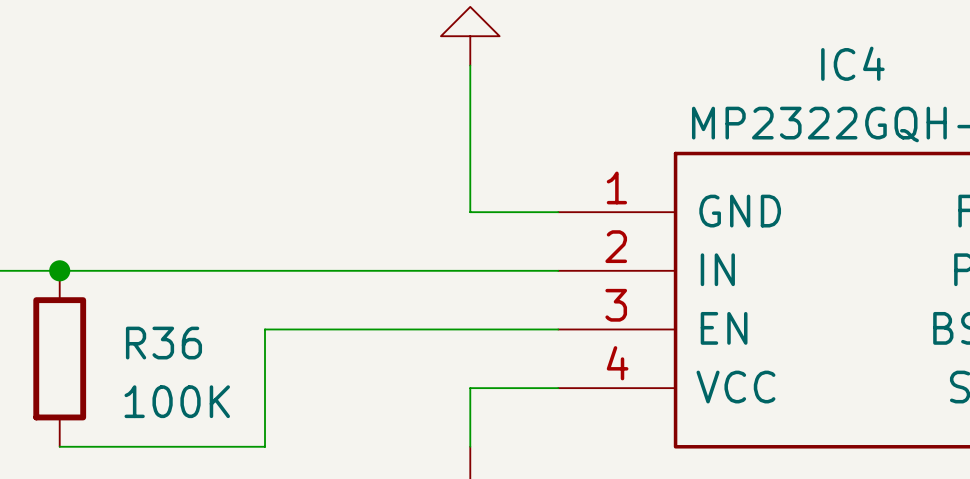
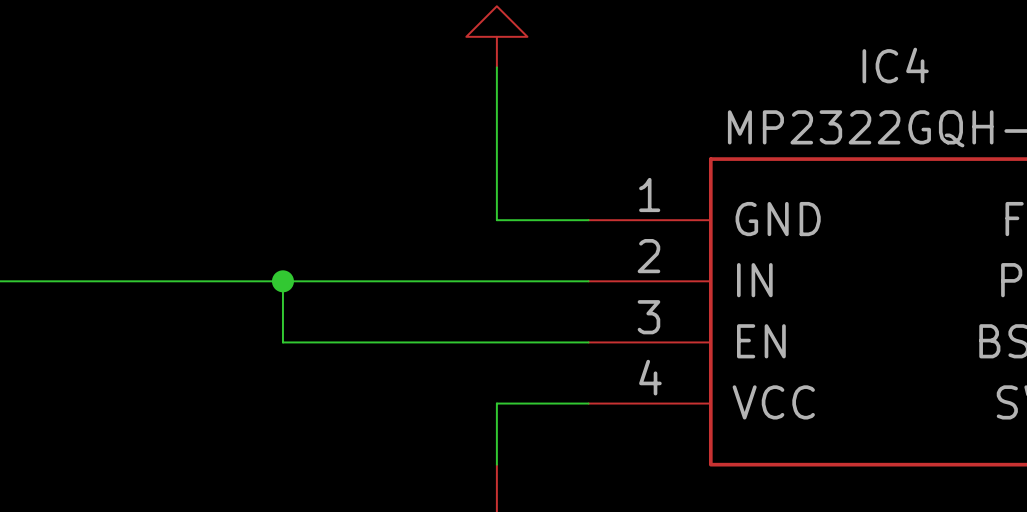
junction: (59, 270) -> none
junction: none -> (282, 281)
wire: (265, 329) (265, 446) (59, 446) -> (282, 342) (282, 281)
R36: 100K (59, 358) -> none

